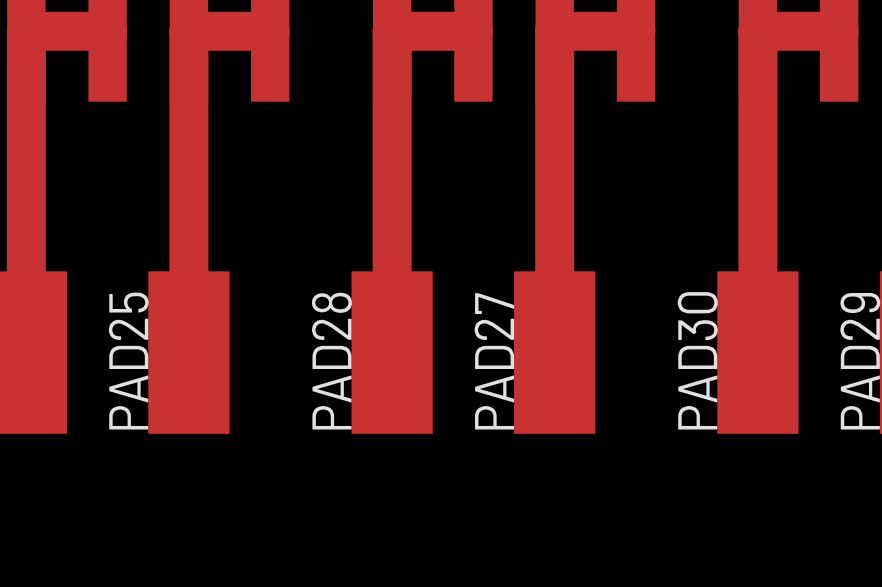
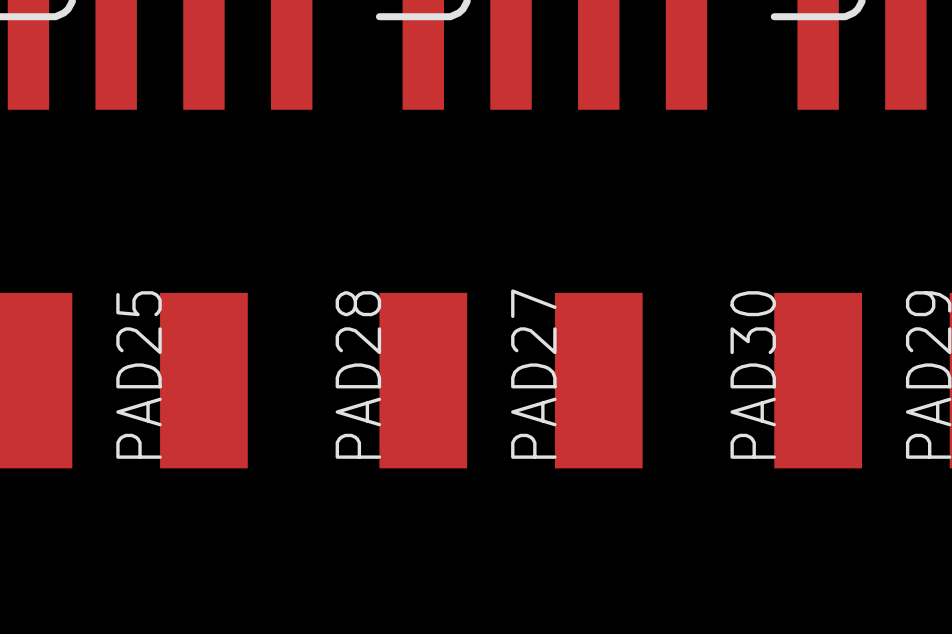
top track: (107, 31) (26, 31) (26, 352) -> none
top track: (270, 31) (188, 31) (188, 352) -> none
top track: (473, 31) (392, 31) (392, 352) -> none
top track: (635, 31) (554, 31) (554, 352) -> none
top track: (839, 31) (757, 31) (757, 352) -> none

